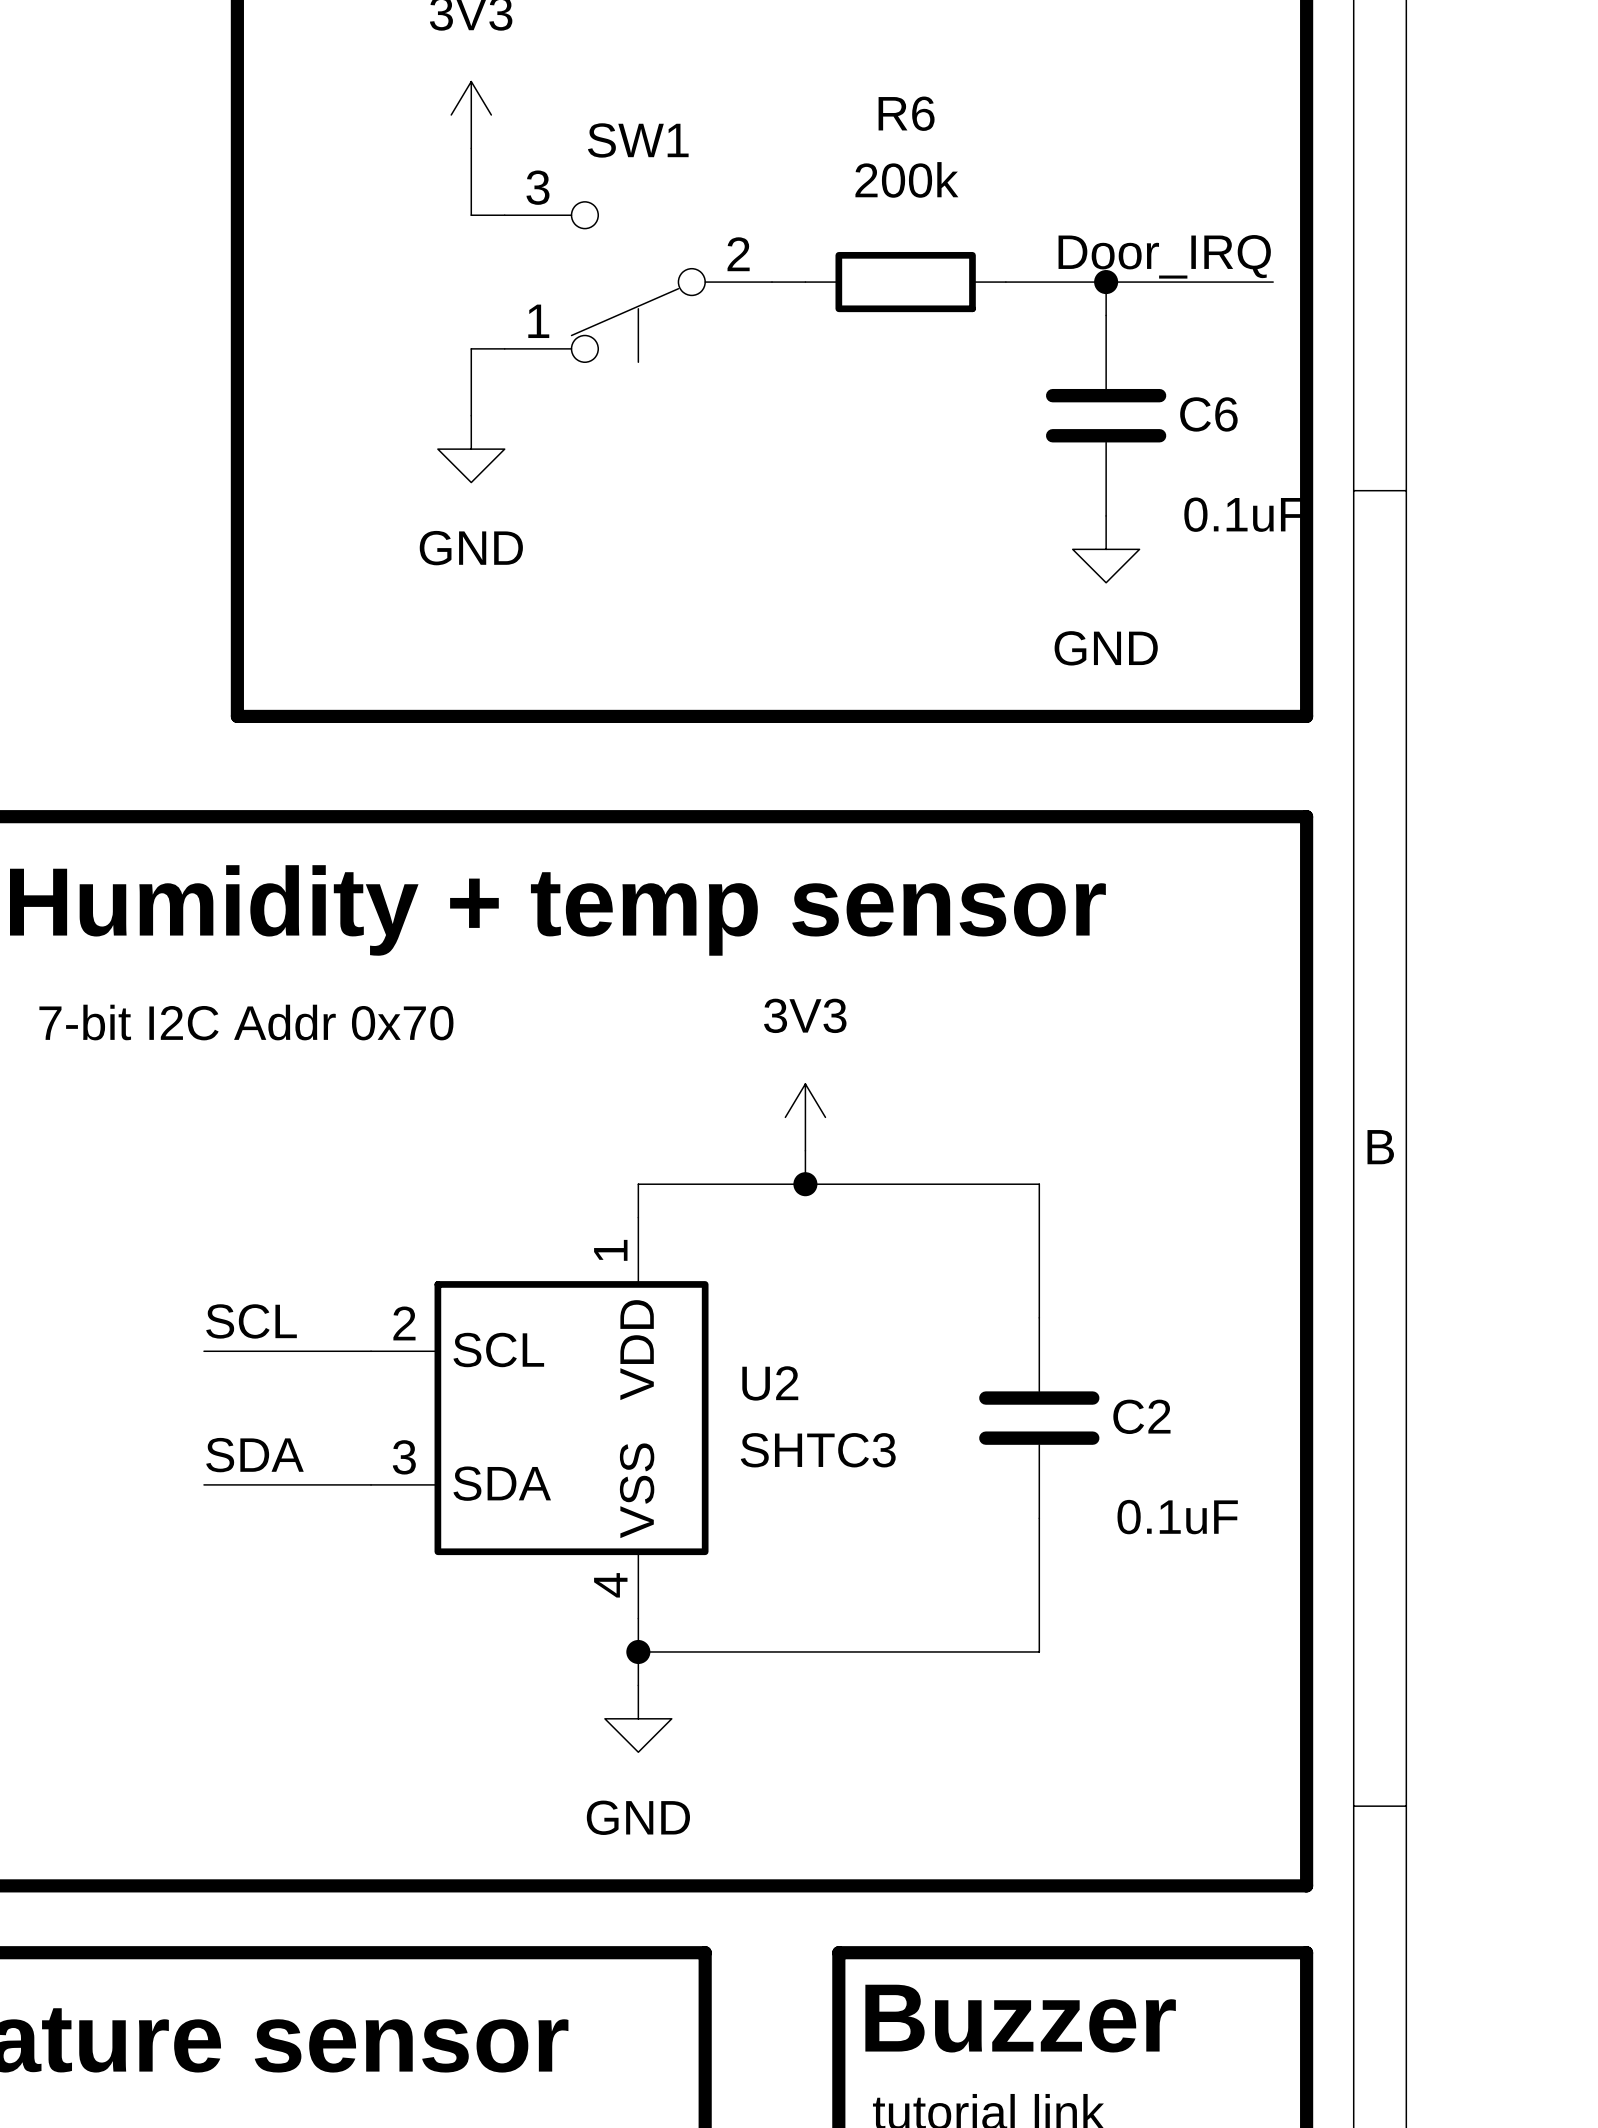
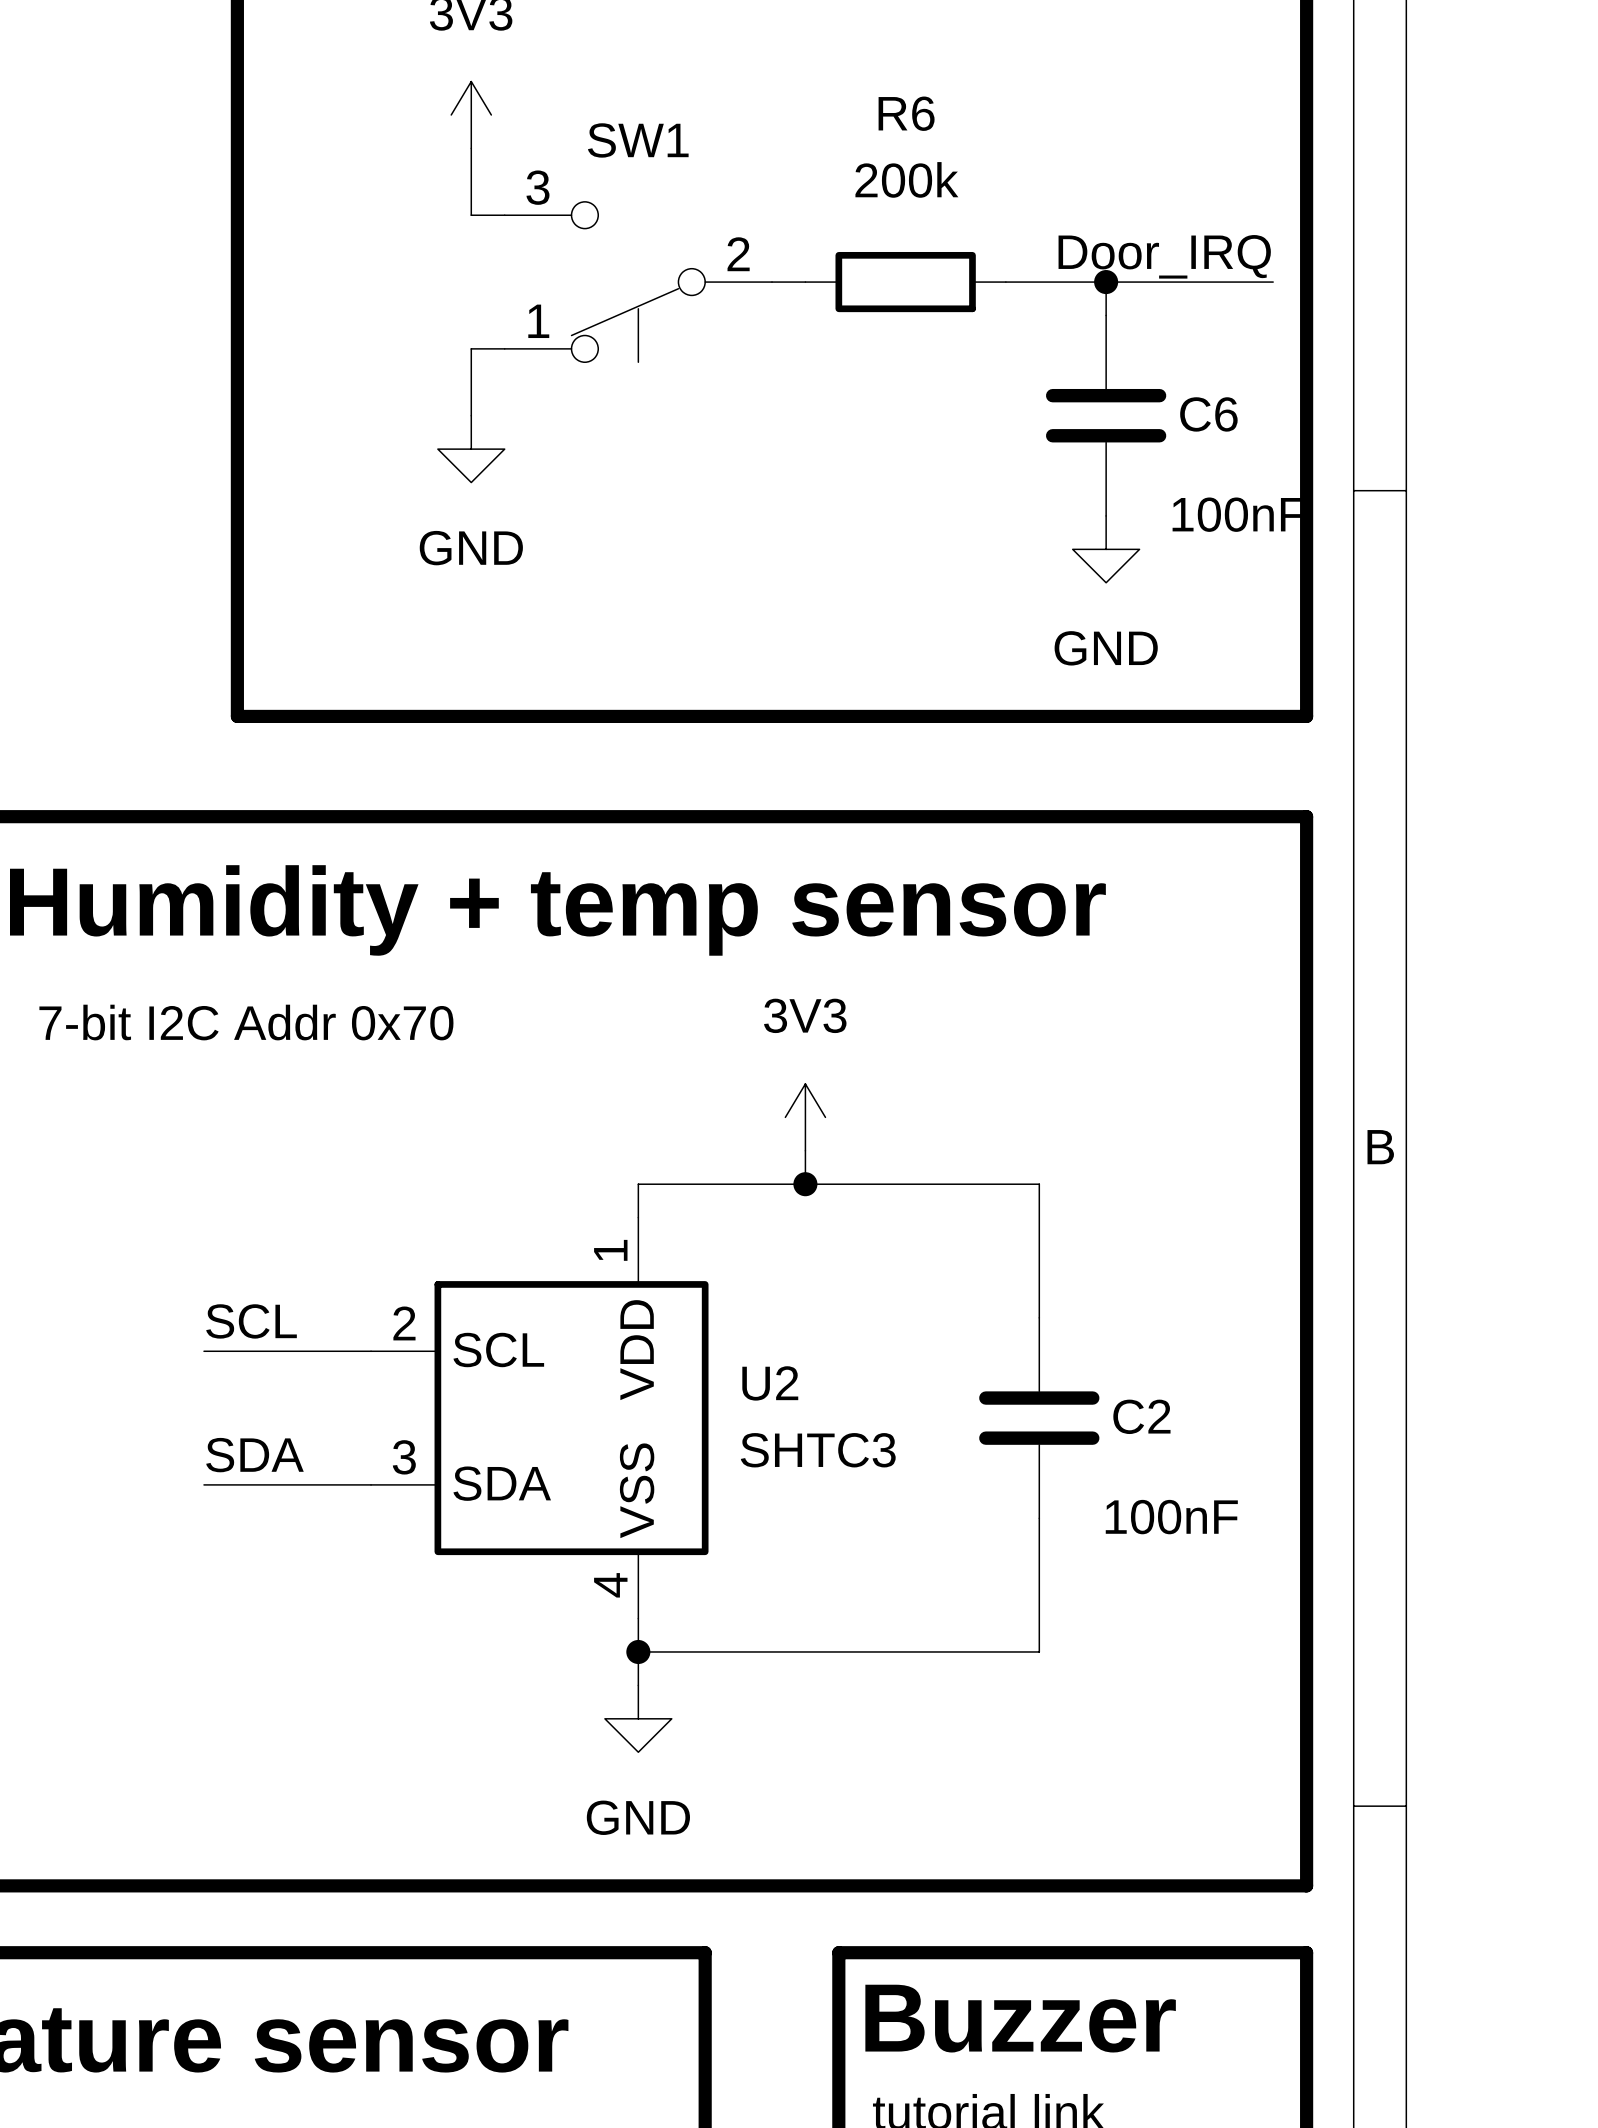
C6 value: 0.1uF (1244, 514) -> 100nF (1238, 514)
C2 value: 0.1uF (1177, 1517) -> 100nF (1171, 1517)

